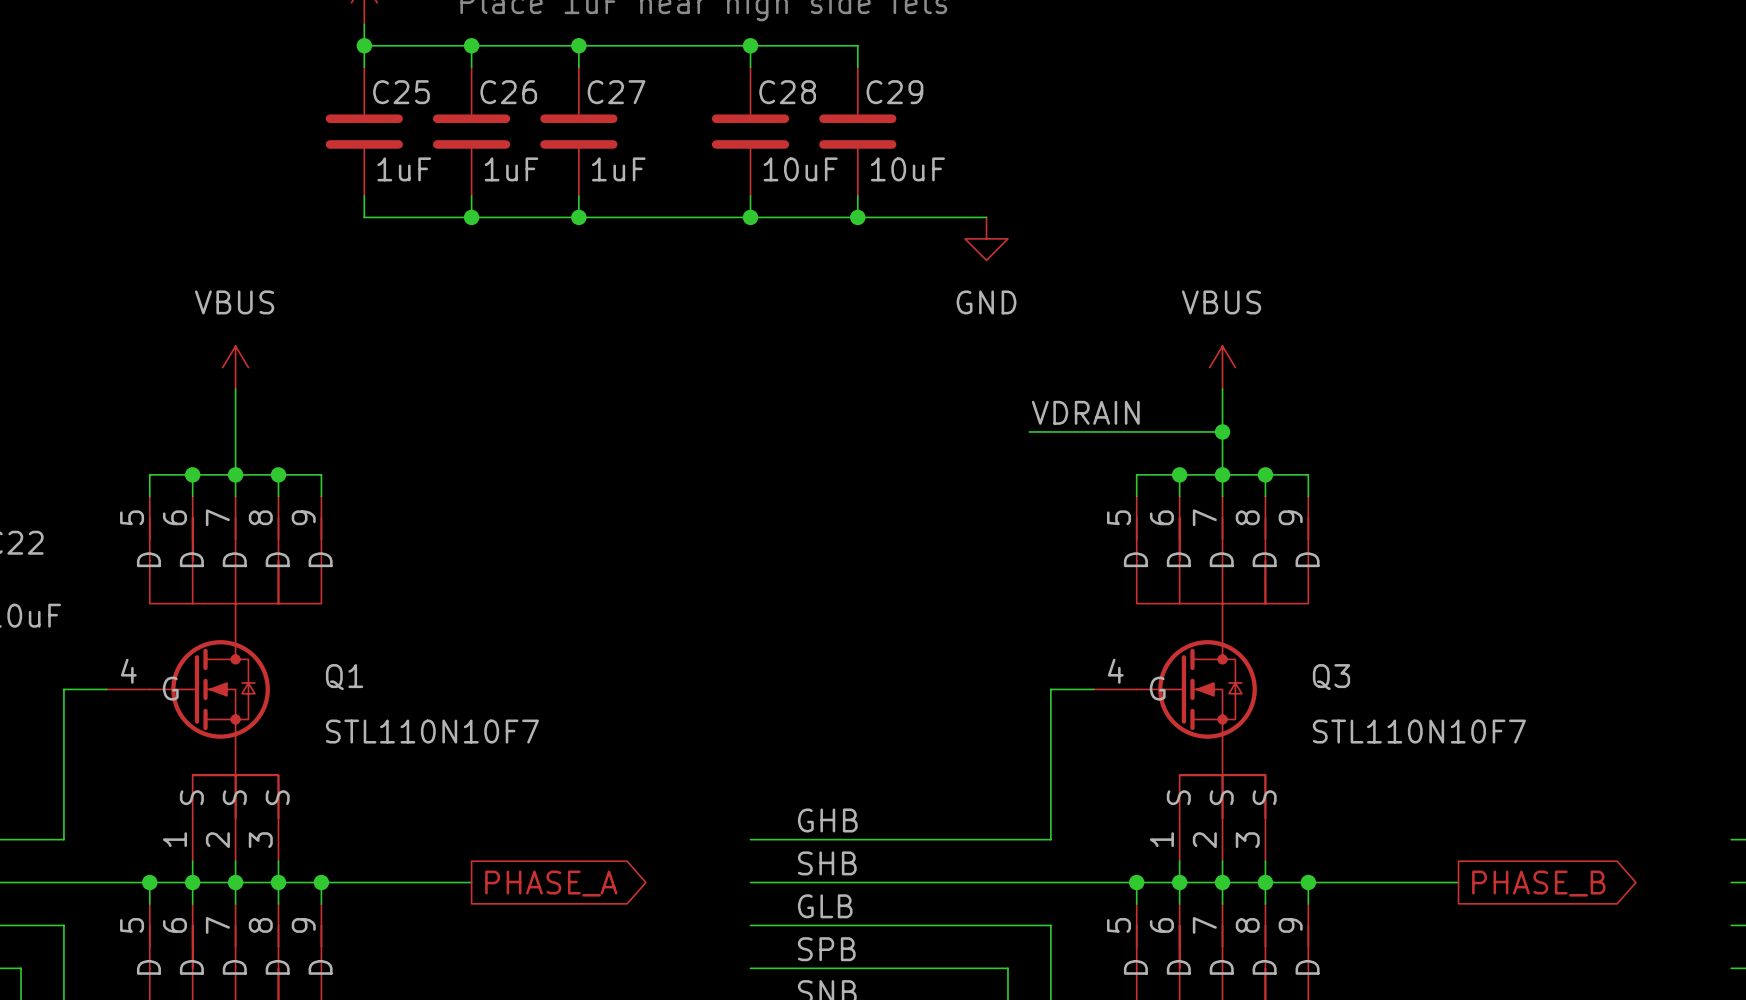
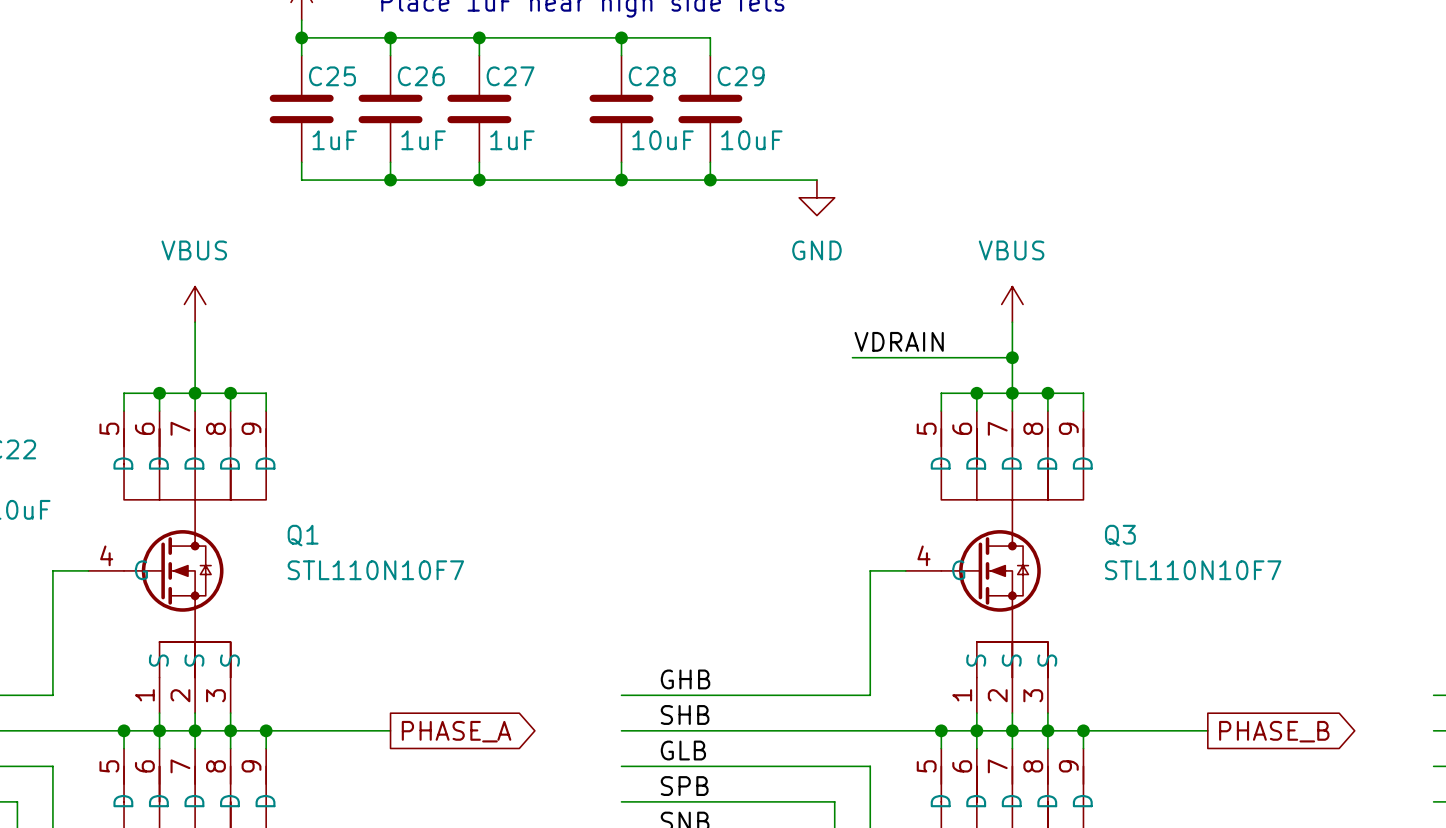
Q1 name position: Q1 (344, 677) -> Q1 (303, 535)
Q3 name position: Q3 (1331, 677) -> Q3 (1120, 535)
Q1 value position: STL110N10F7 (432, 731) -> STL110N10F7 (375, 570)
Q3 value position: STL110N10F7 (1419, 731) -> STL110N10F7 (1193, 570)

